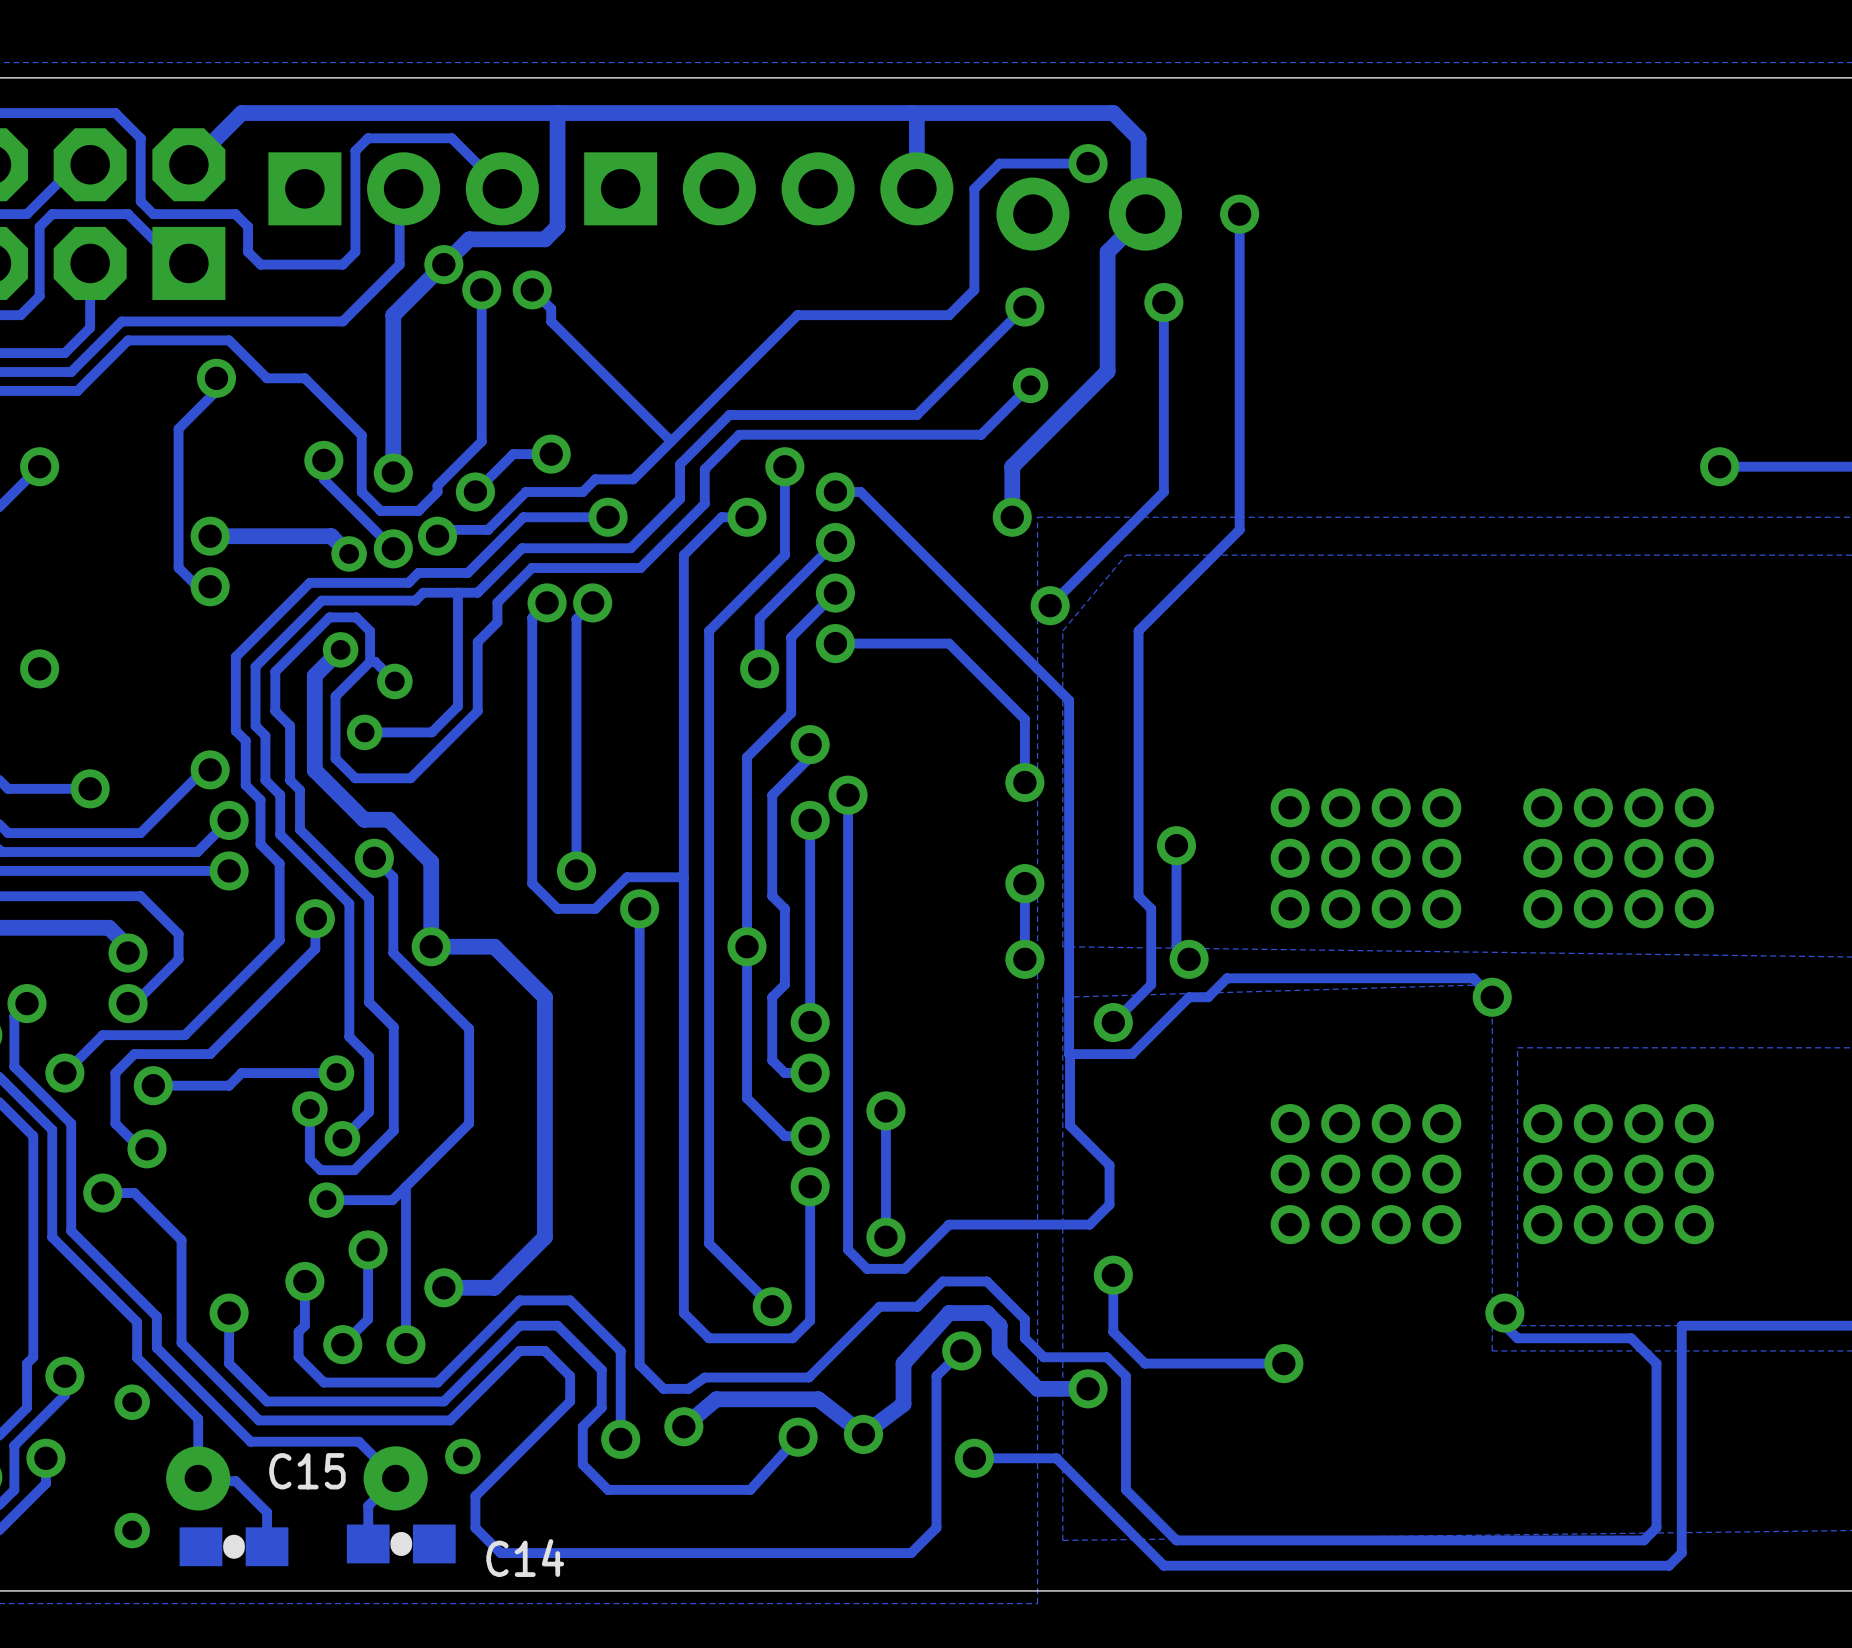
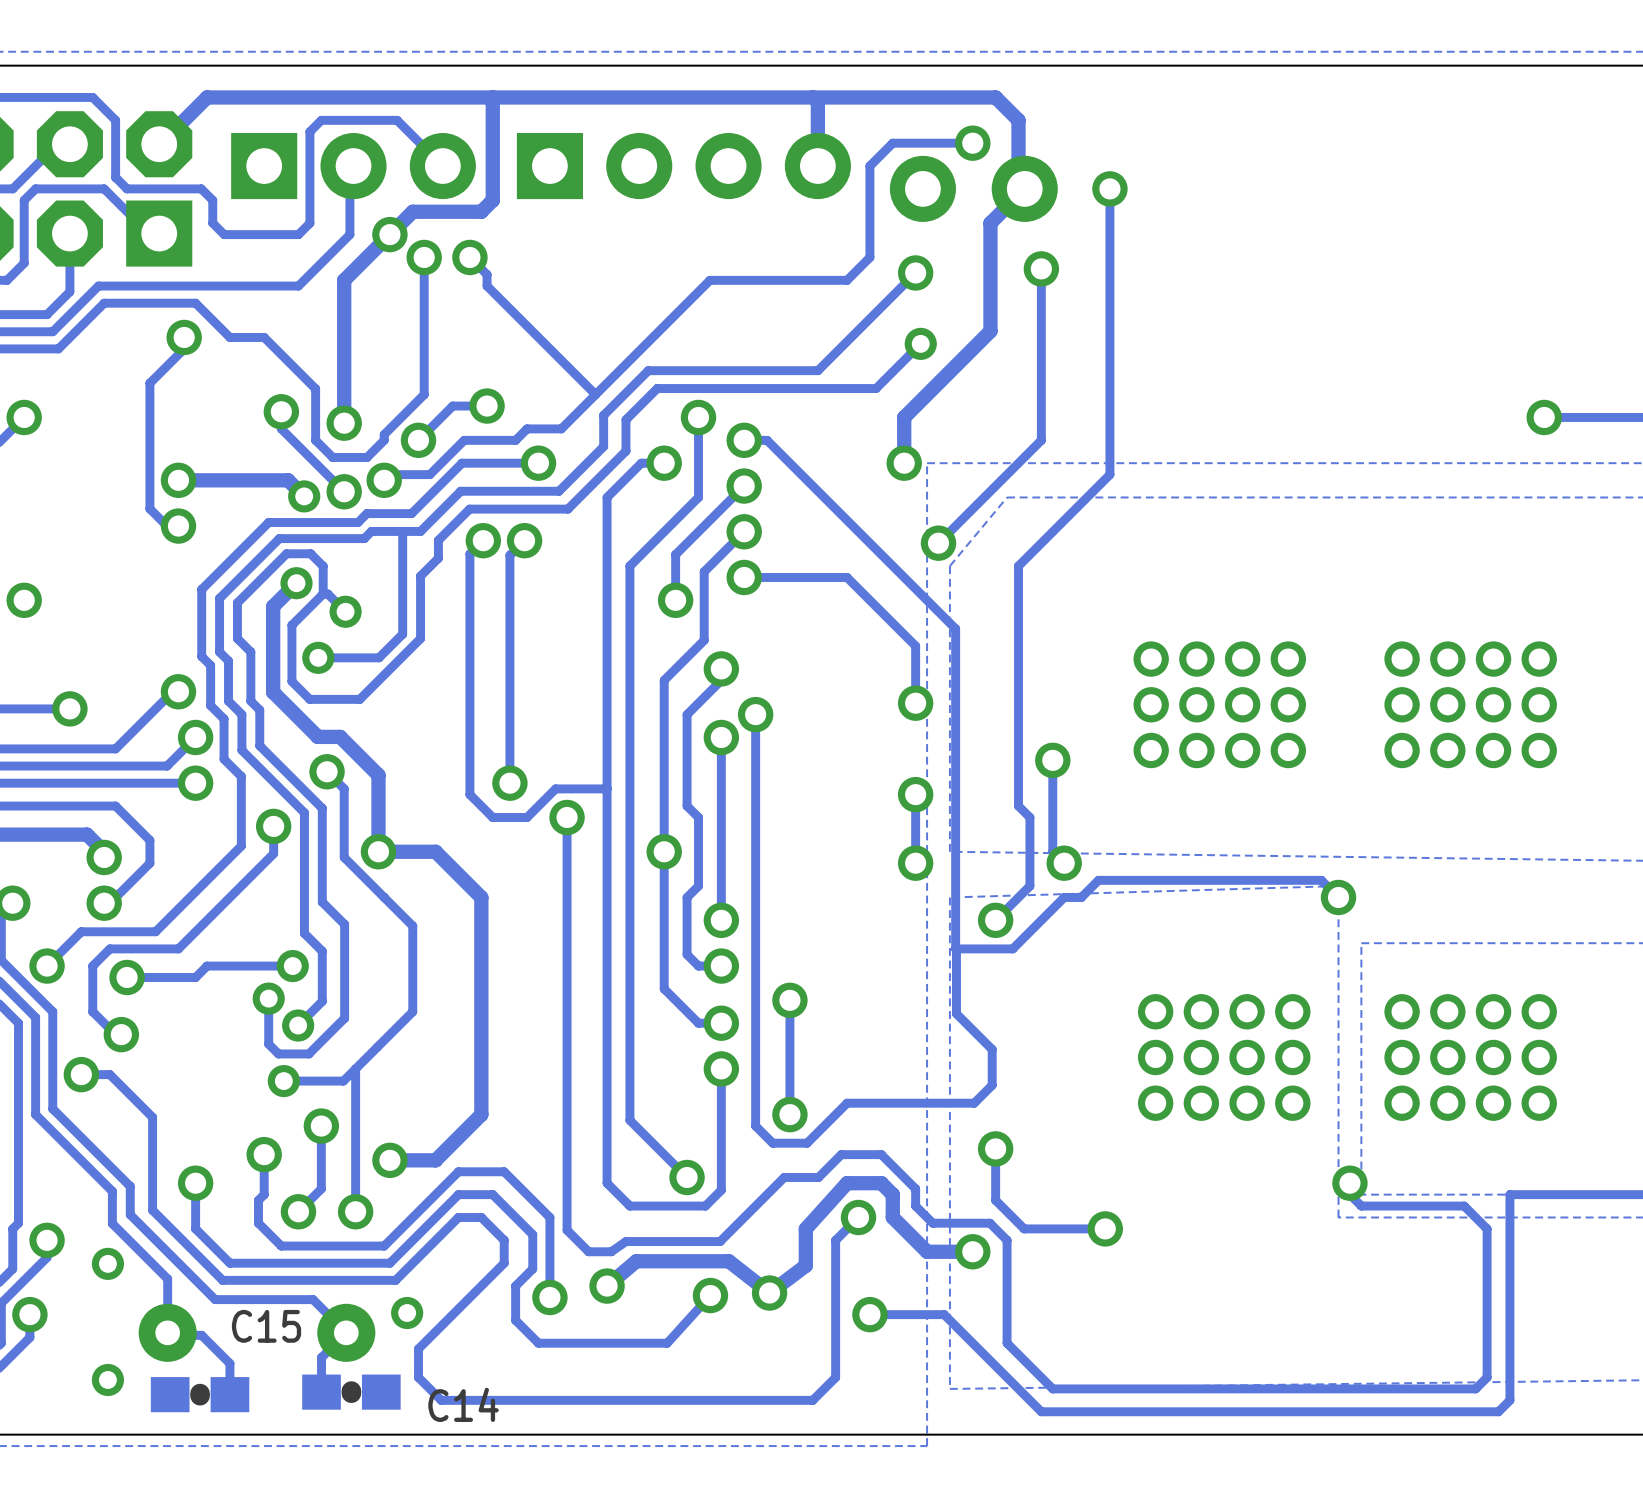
via: none -> (1151, 659)
via: none -> (1196, 659)
via: none -> (1242, 659)
via: none -> (1288, 659)
via: none -> (1402, 659)
via: none -> (1447, 659)
via: none -> (1493, 659)
via: none -> (1539, 659)
via: none -> (1151, 704)
via: none -> (1196, 704)
via: none -> (1242, 704)
via: none -> (1288, 704)
via: none -> (1402, 704)
via: none -> (1447, 704)
via: none -> (1493, 704)
via: none -> (1539, 704)
via: (1290, 807) -> none
via: (1340, 807) -> none
via: (1391, 807) -> none
via: (1441, 807) -> none
via: (1542, 807) -> none
via: (1593, 807) -> none
via: (1643, 807) -> none
via: (1694, 807) -> none
via: none -> (1151, 750)
via: none -> (1196, 750)
via: none -> (1242, 750)
via: none -> (1288, 750)
via: none -> (1402, 750)
via: none -> (1447, 750)
via: none -> (1493, 750)
via: none -> (1539, 750)
via: (1290, 858) -> none
via: (1340, 858) -> none
via: (1391, 858) -> none
via: (1441, 858) -> none
via: (1542, 858) -> none
via: (1593, 858) -> none
via: (1643, 858) -> none
via: (1694, 858) -> none
via: (1290, 908) -> none
via: (1340, 908) -> none
via: (1391, 908) -> none
via: (1441, 908) -> none
via: (1542, 908) -> none
via: (1593, 908) -> none
via: (1643, 908) -> none
via: (1694, 908) -> none
via: (1542, 1123) -> none
via: none -> (1402, 1011)
via: (1593, 1123) -> none
via: none -> (1447, 1011)
via: (1643, 1123) -> none
via: none -> (1493, 1011)
via: (1694, 1123) -> none
via: none -> (1539, 1011)
via: (1542, 1174) -> none
via: none -> (1402, 1057)
via: (1593, 1174) -> none
via: none -> (1447, 1057)
via: (1643, 1174) -> none
via: none -> (1493, 1057)
via: (1694, 1174) -> none
via: none -> (1539, 1057)
via: (1542, 1224) -> none
via: none -> (1402, 1103)
via: (1593, 1224) -> none
via: none -> (1447, 1103)
via: (1643, 1224) -> none
via: none -> (1493, 1103)
via: (1694, 1224) -> none
via: none -> (1539, 1103)
track: (1283, 1363) (1234, 1363) -> none
via position: (1283, 1363) -> (1105, 1228)

